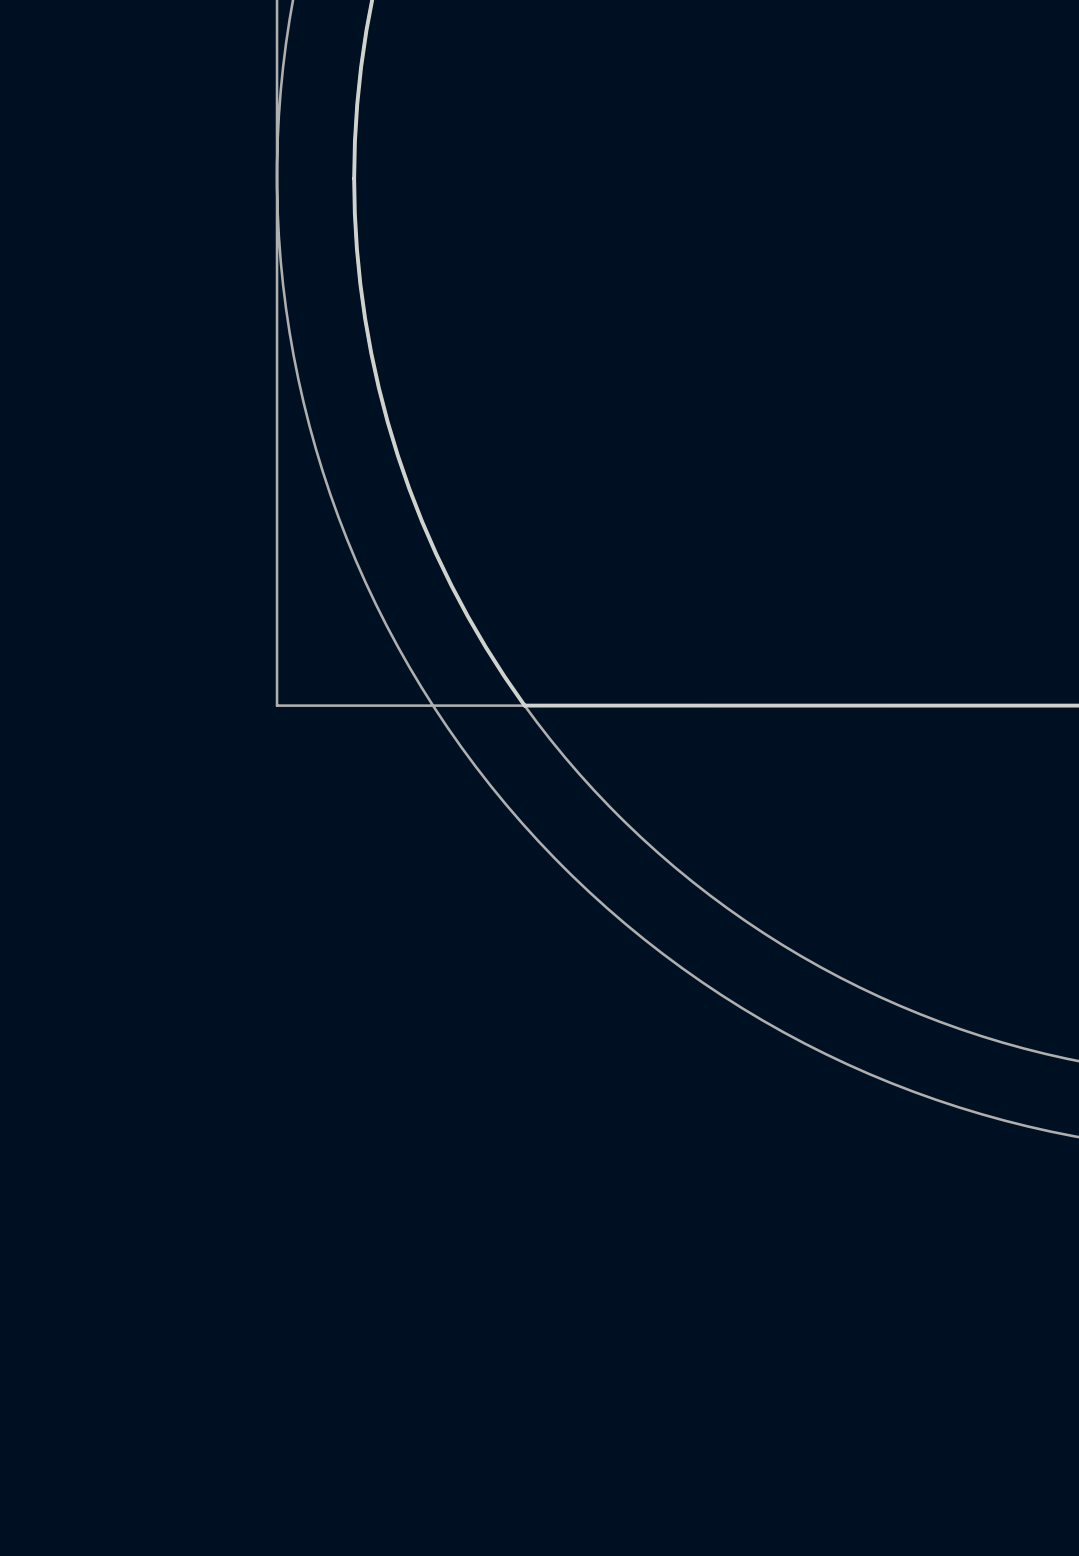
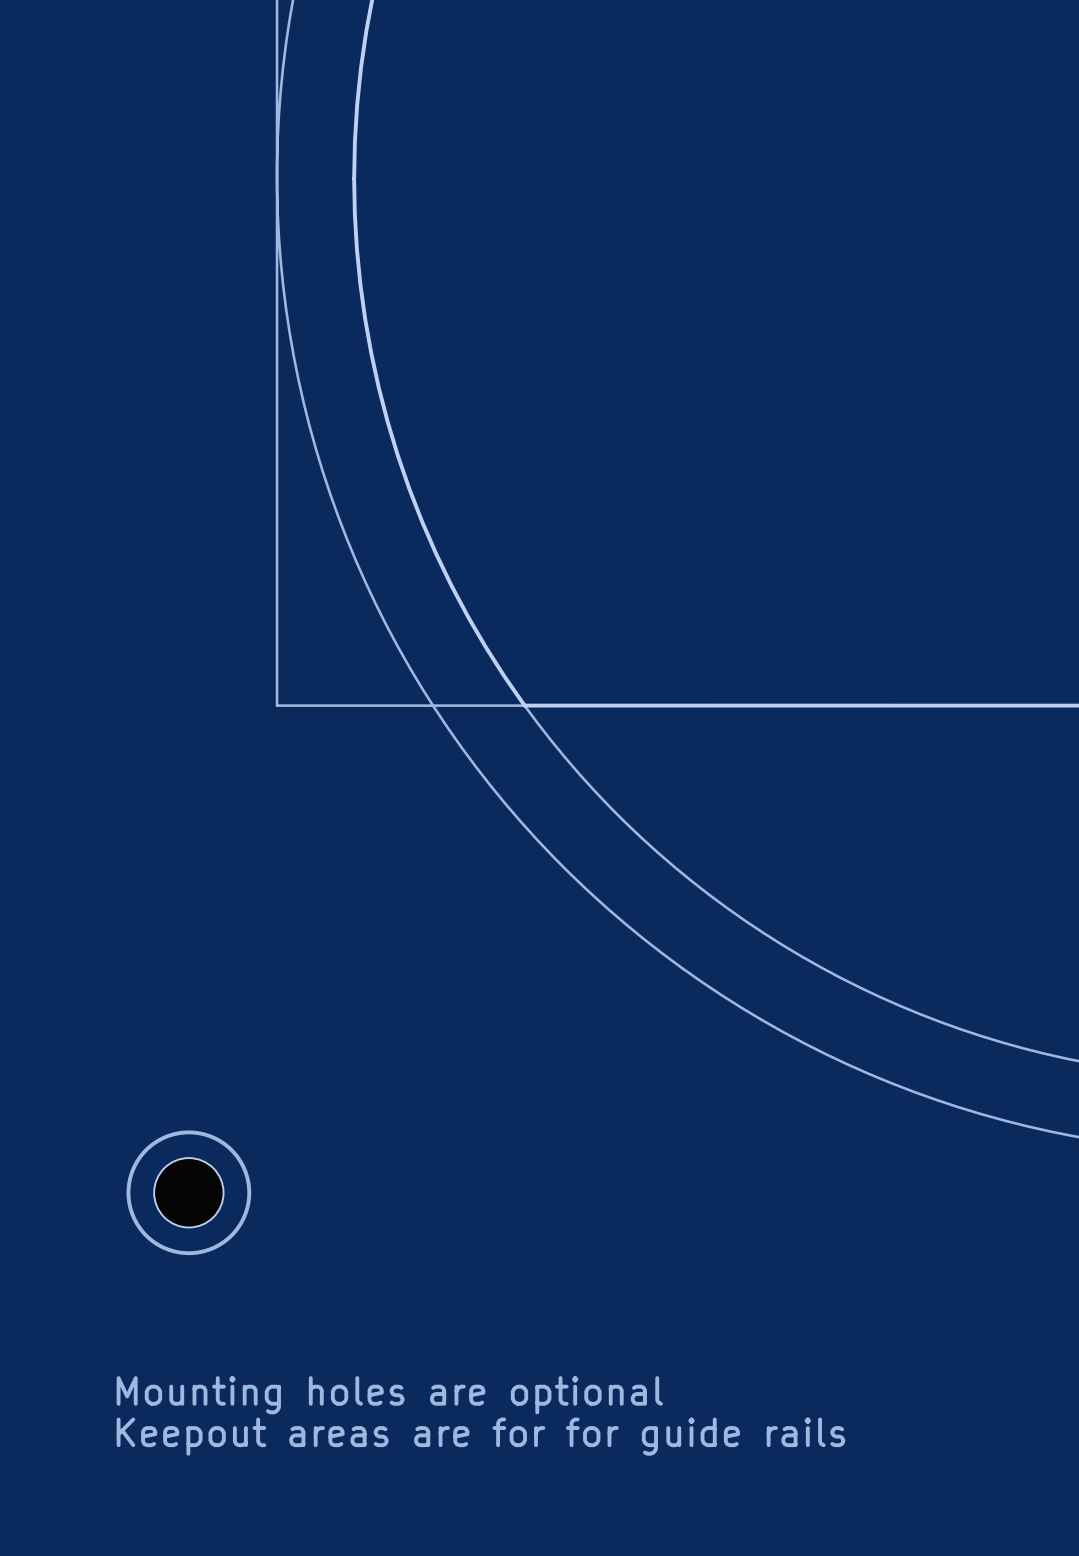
part: none -> (188, 1192)
text: none -> Mounting holes are optional (389, 1395)
text: none -> Keepout areas are for for guide rails (480, 1436)

